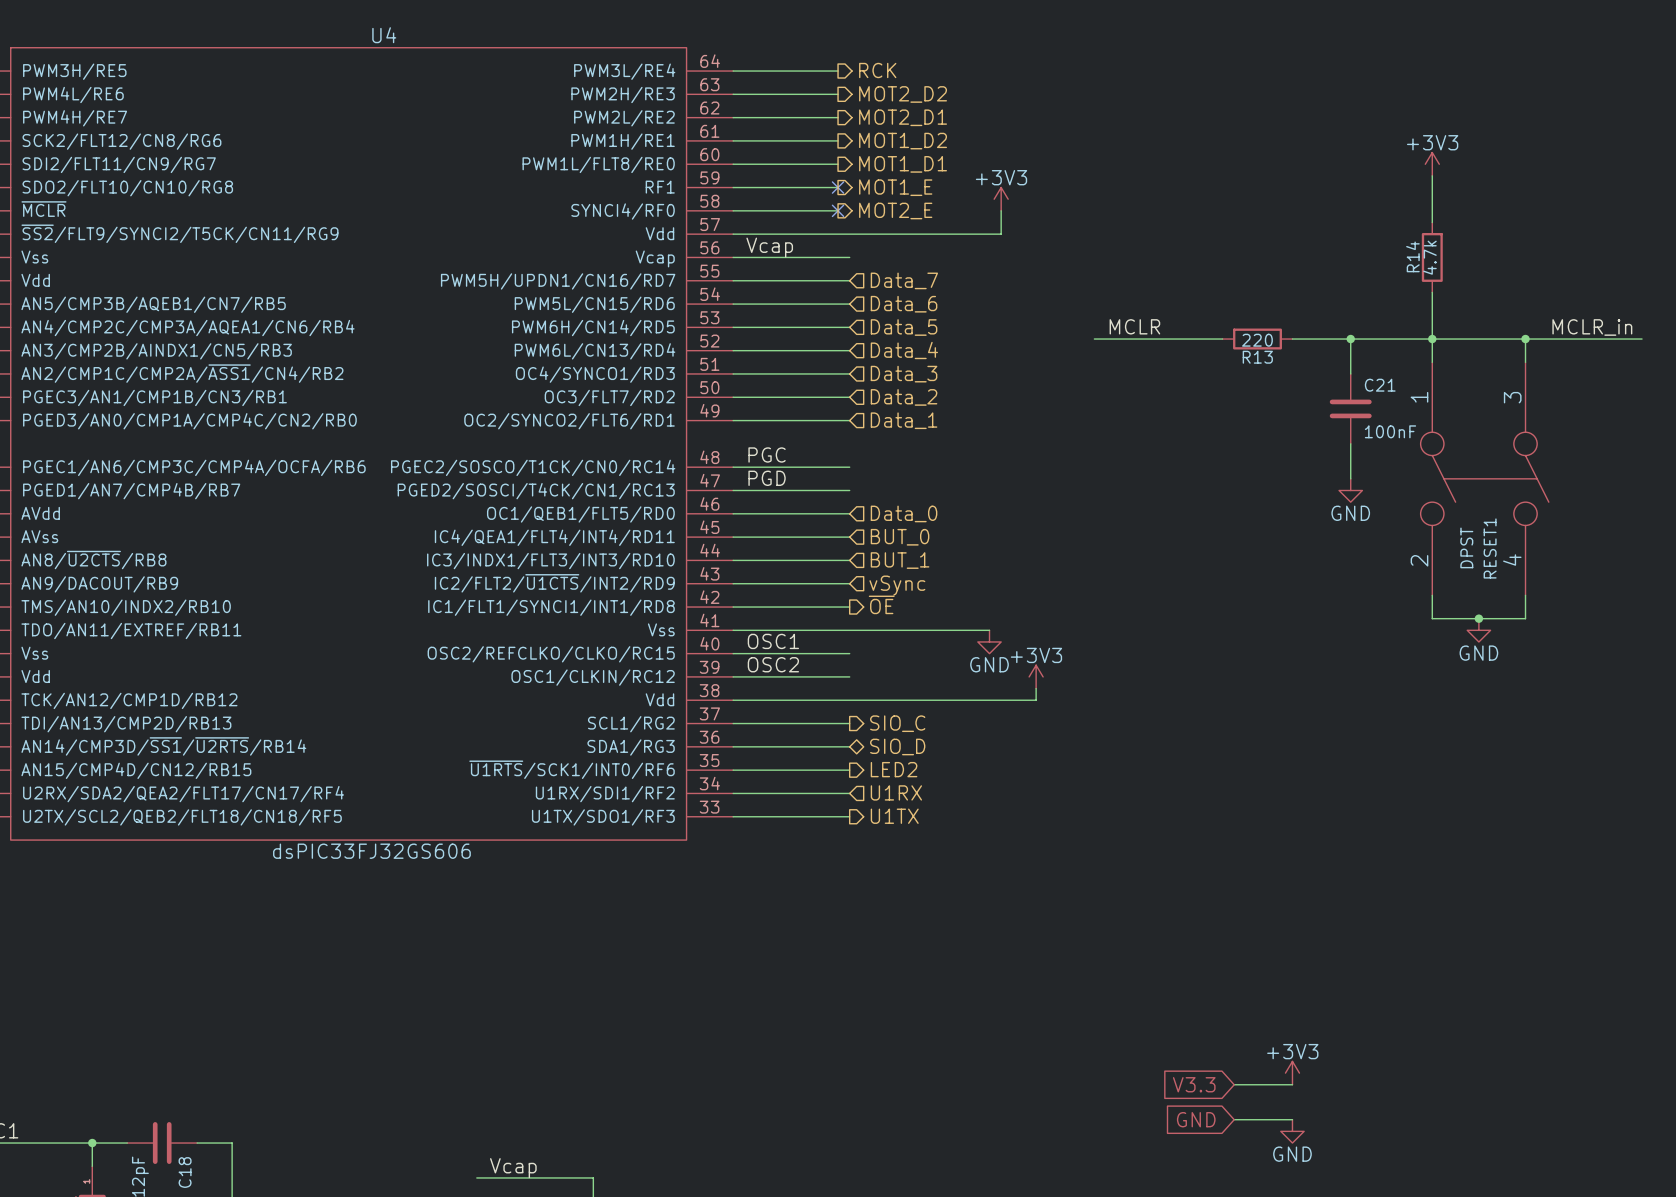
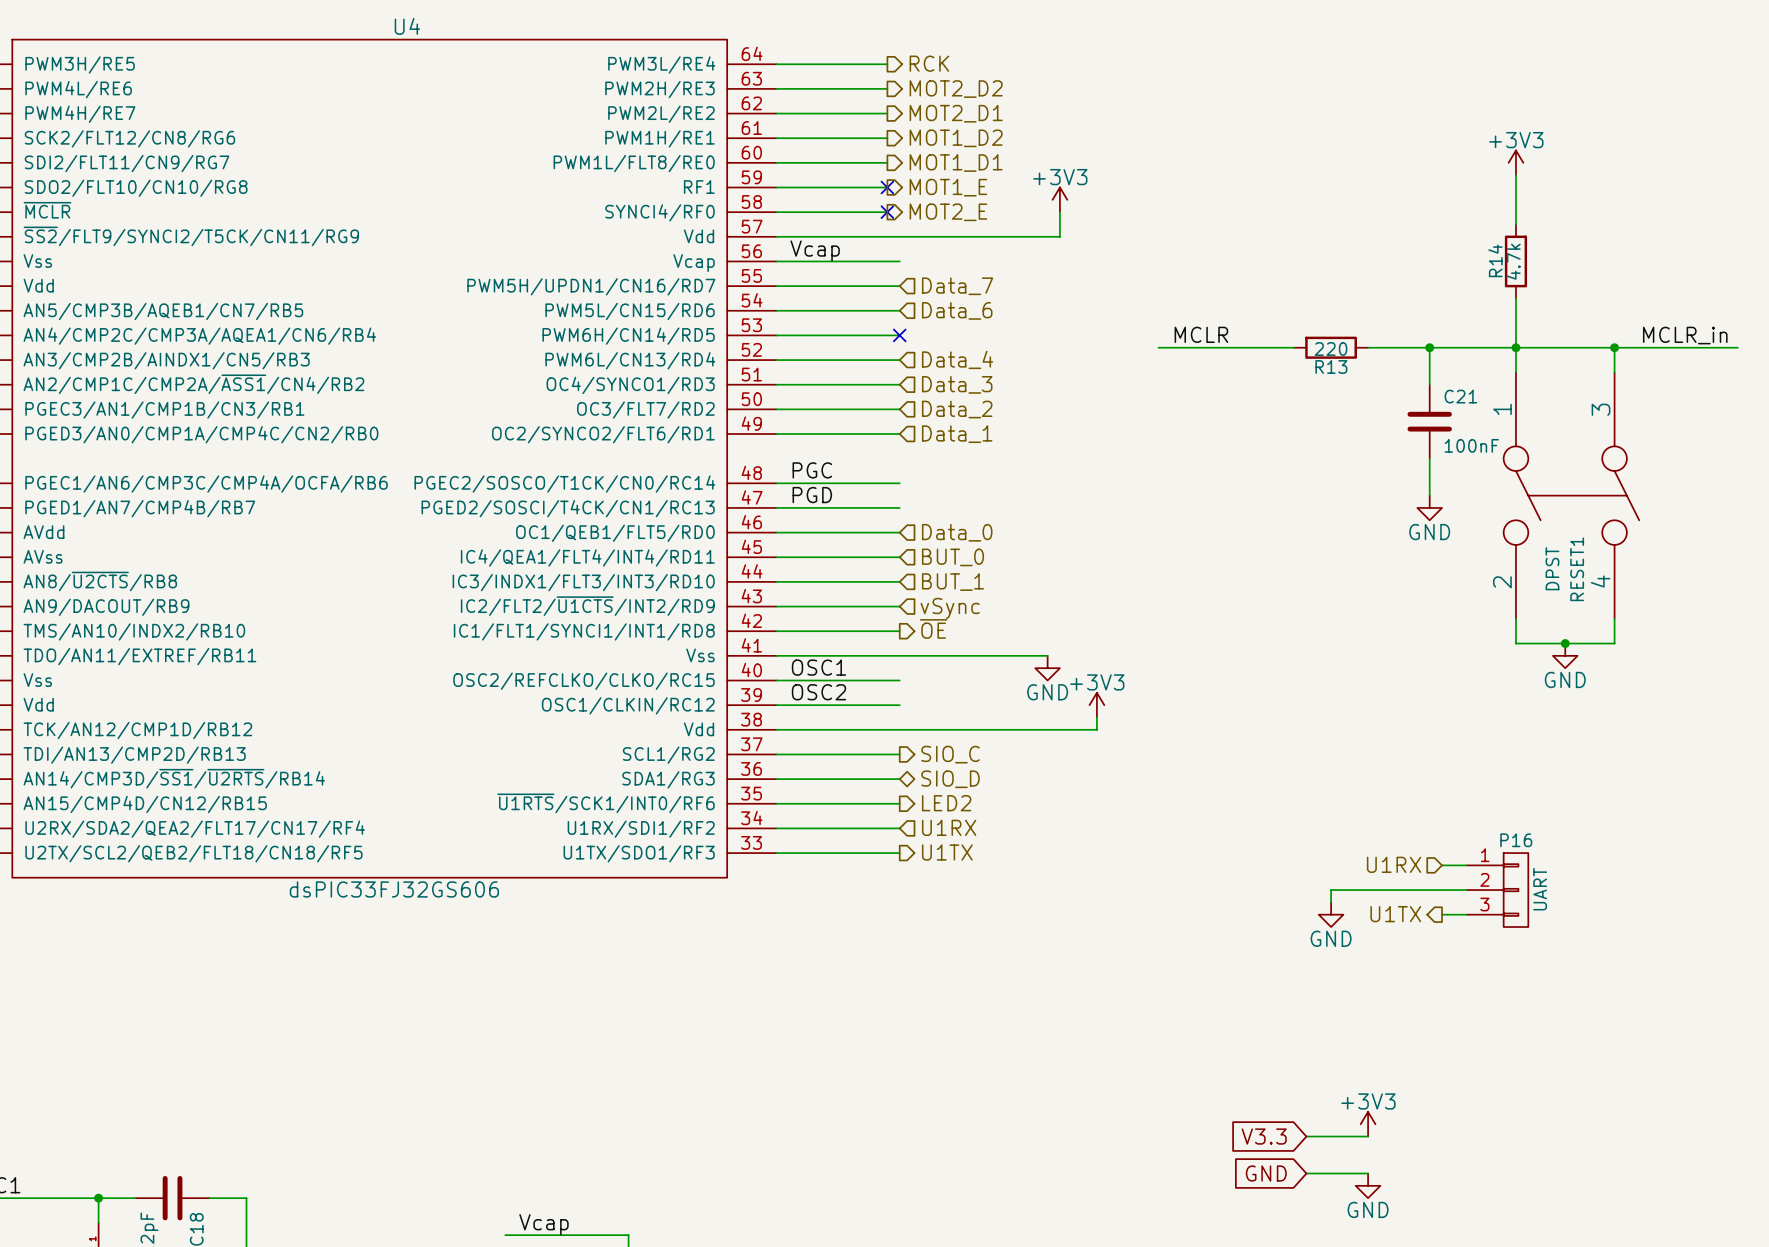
no-connect mark: none -> (899, 335)
hierarchical label: Data_5 (904, 327) -> none
hierarchical label: none -> U1RX (1394, 864)
wire: none -> (1442, 865) (1466, 865)
wire: none -> (1466, 890) (1331, 890) (1331, 902)
P16: none -> UART (1497, 890)
hierarchical label: none -> U1TX (1395, 914)
power symbol: none -> GND (1331, 914)
wire: none -> (1442, 914) (1466, 914)

